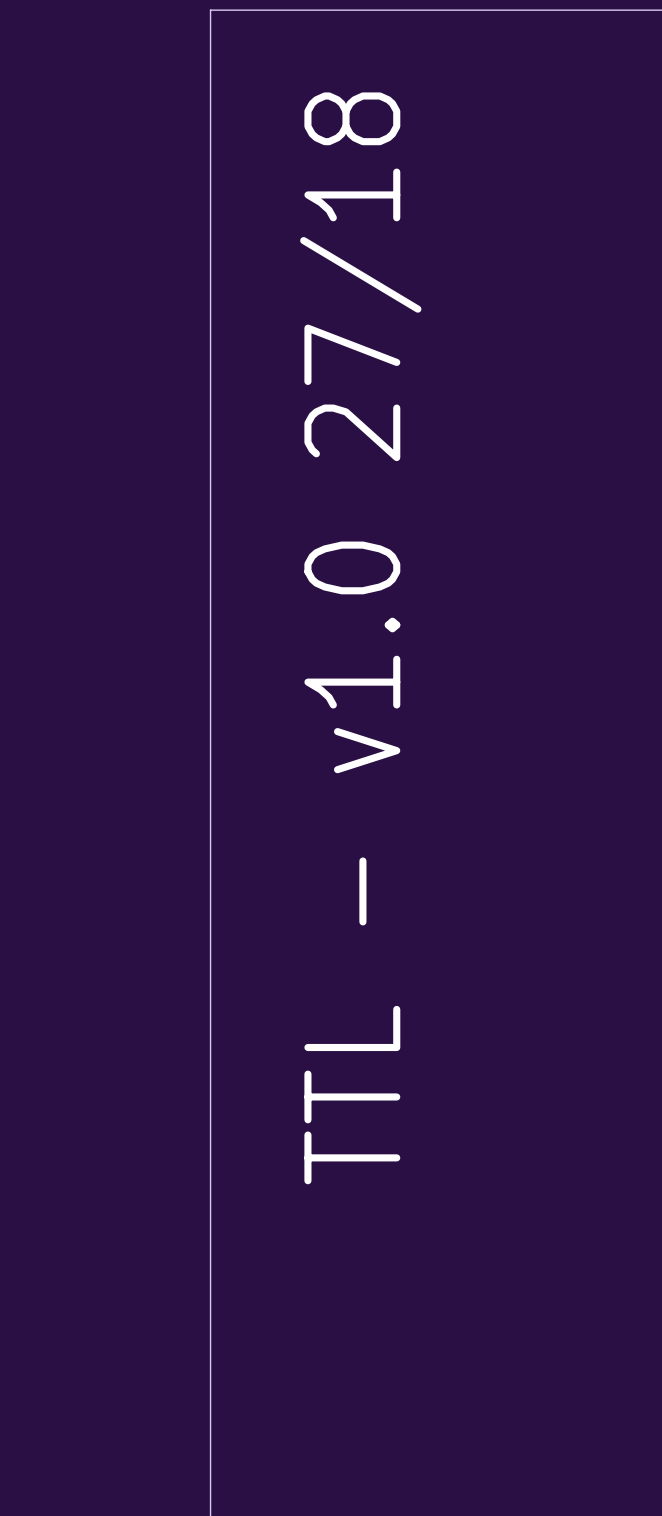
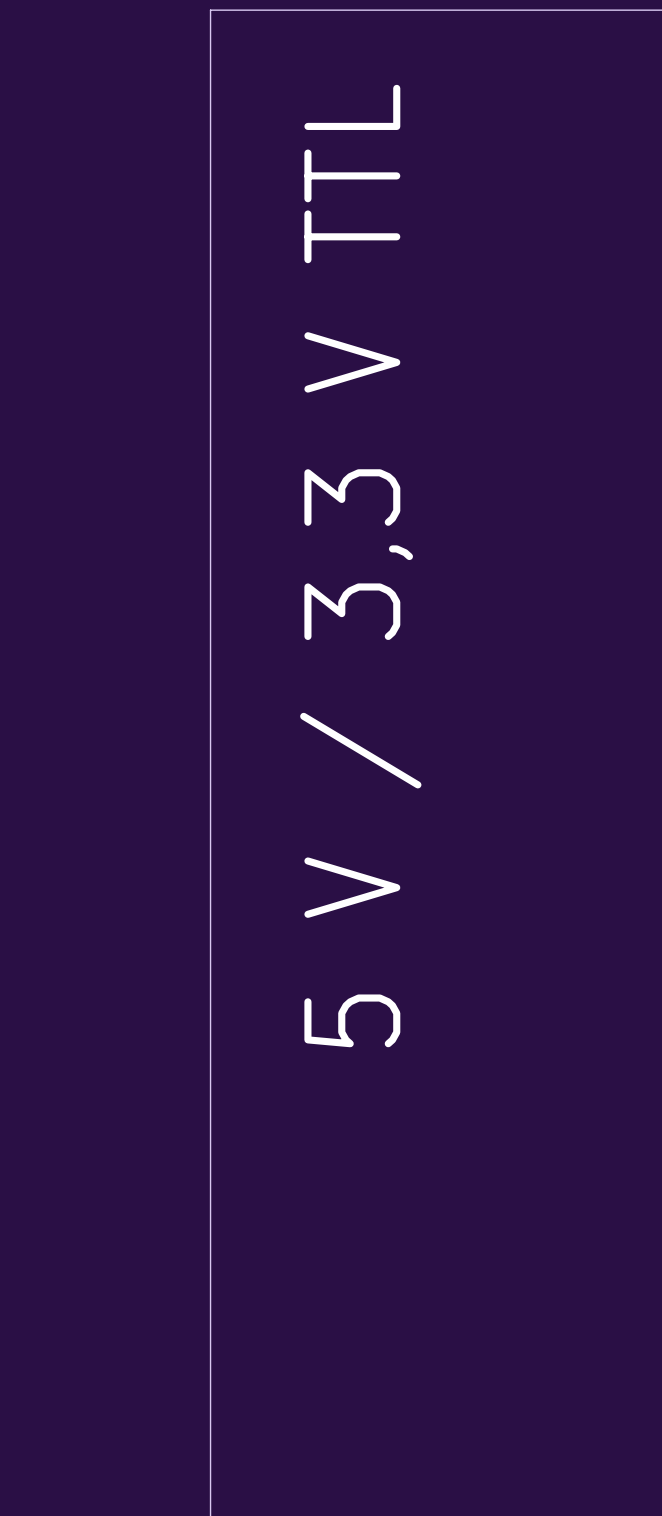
text: TTL - v1.0 27/18 (360, 638) -> 5 V / 3,3 V TTL (360, 566)

